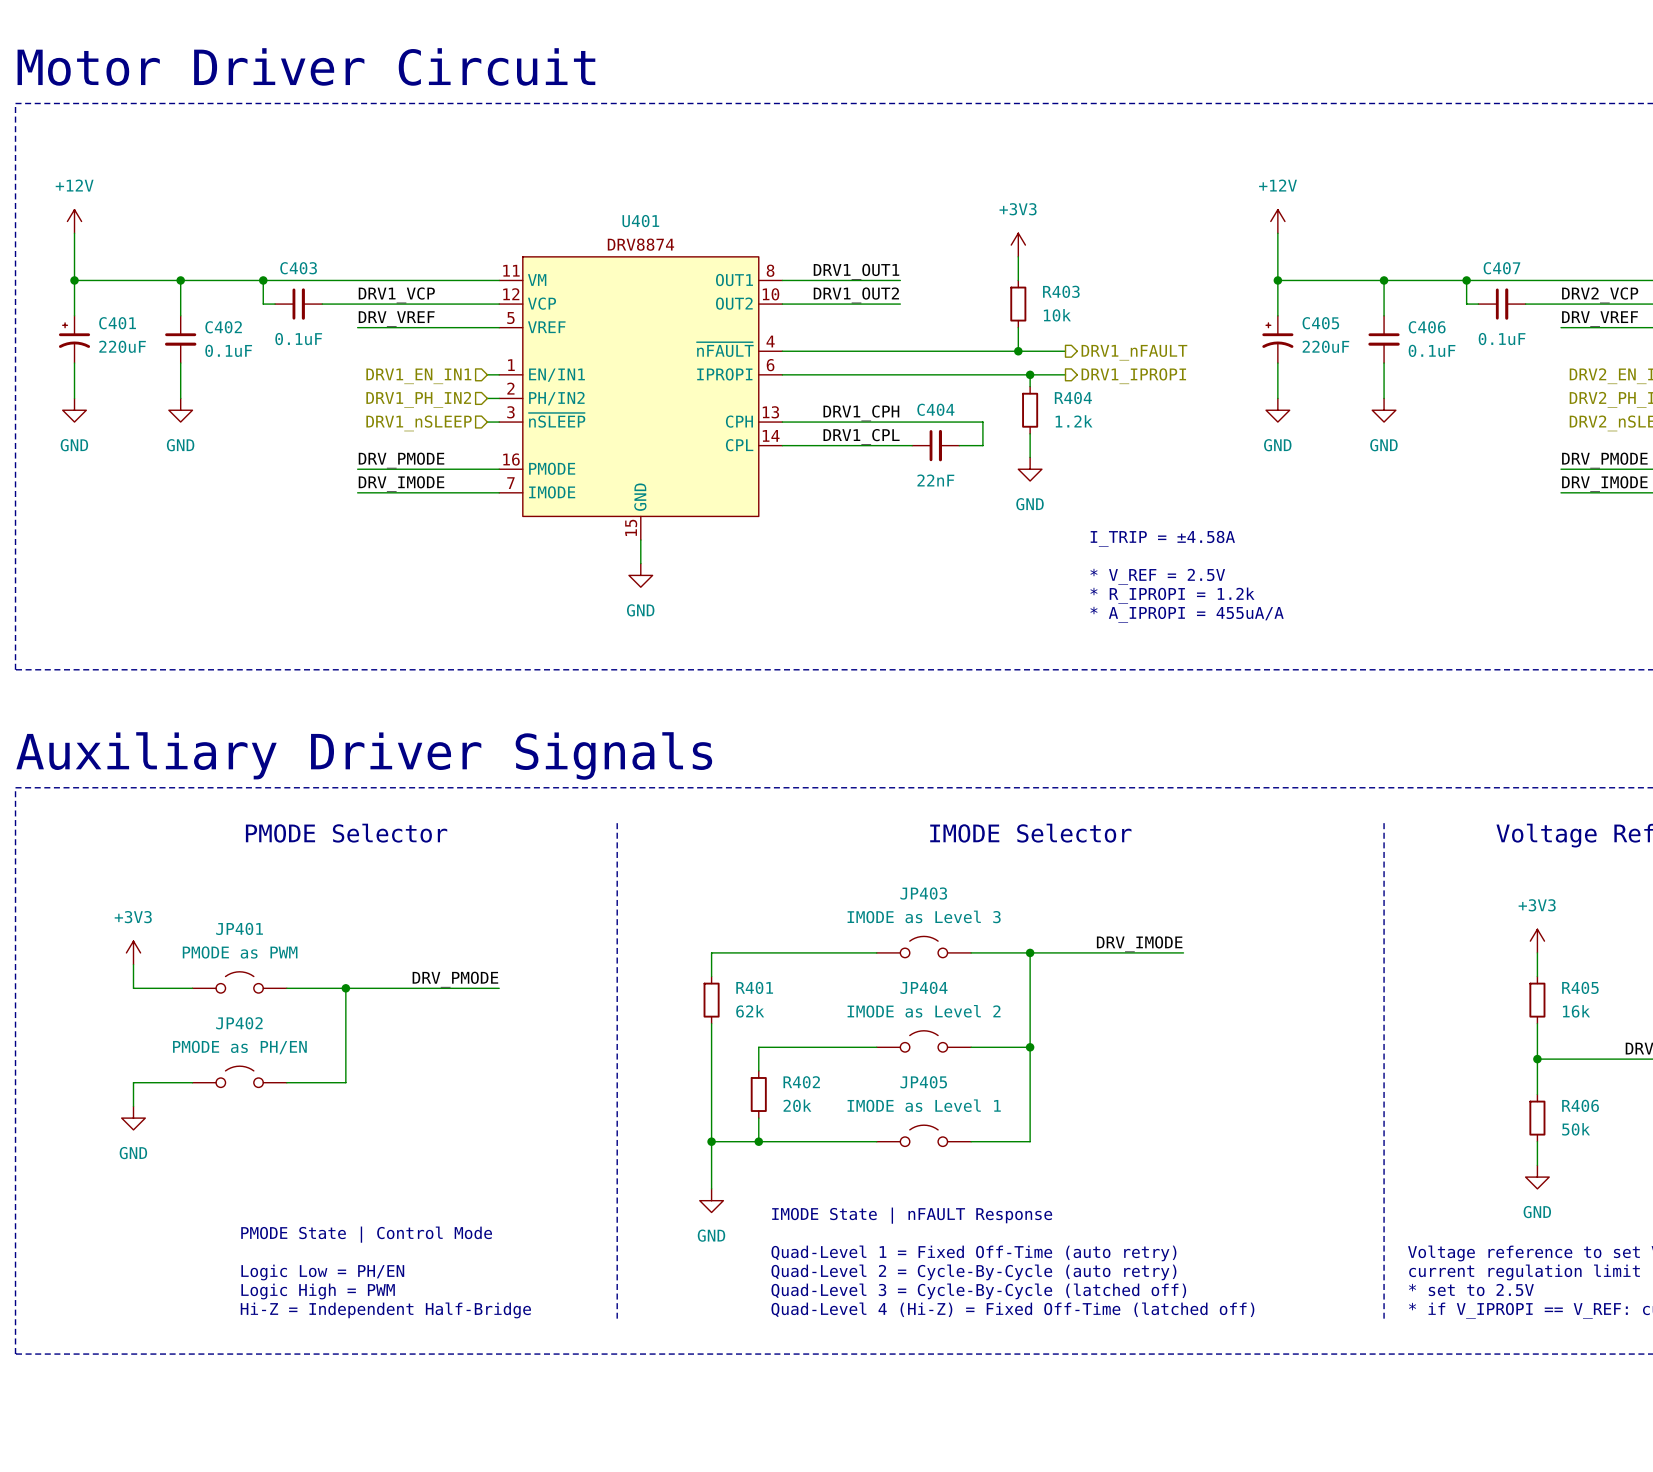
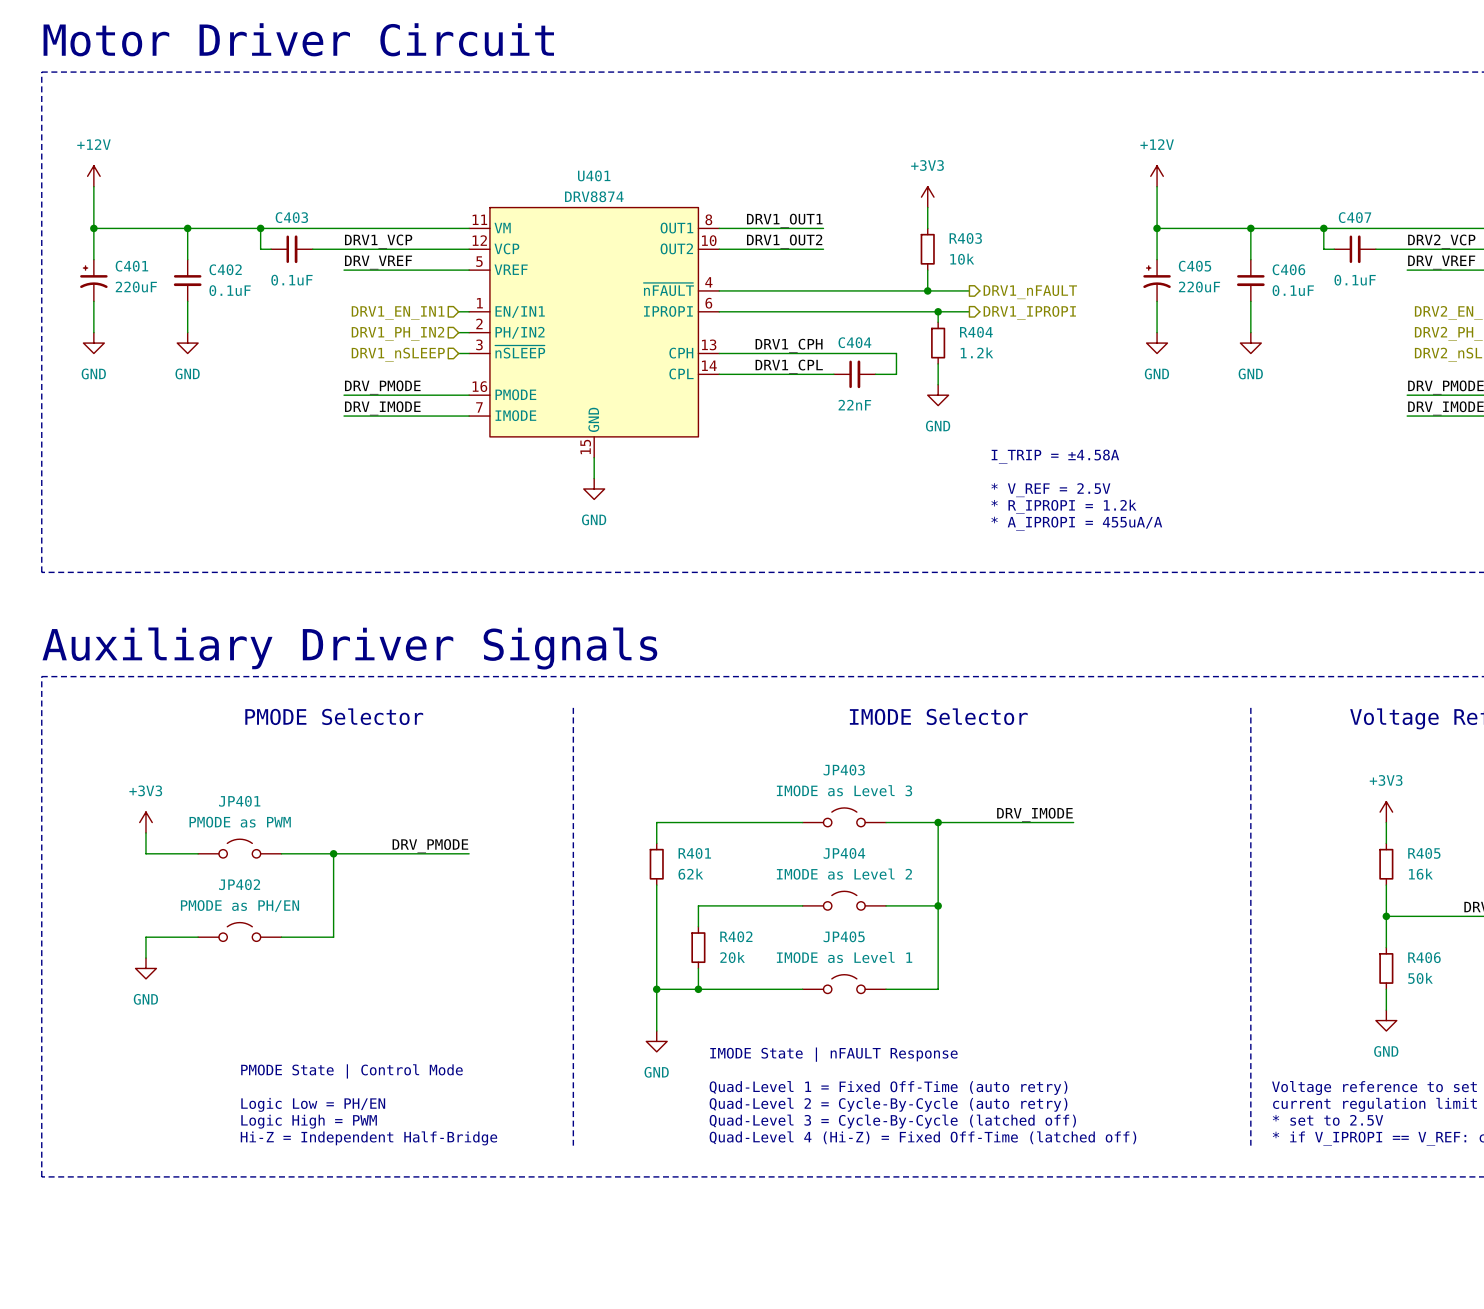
U401 text: DRV8874 (640, 244) -> none
U401 value: none -> DRV8874 (594, 196)

